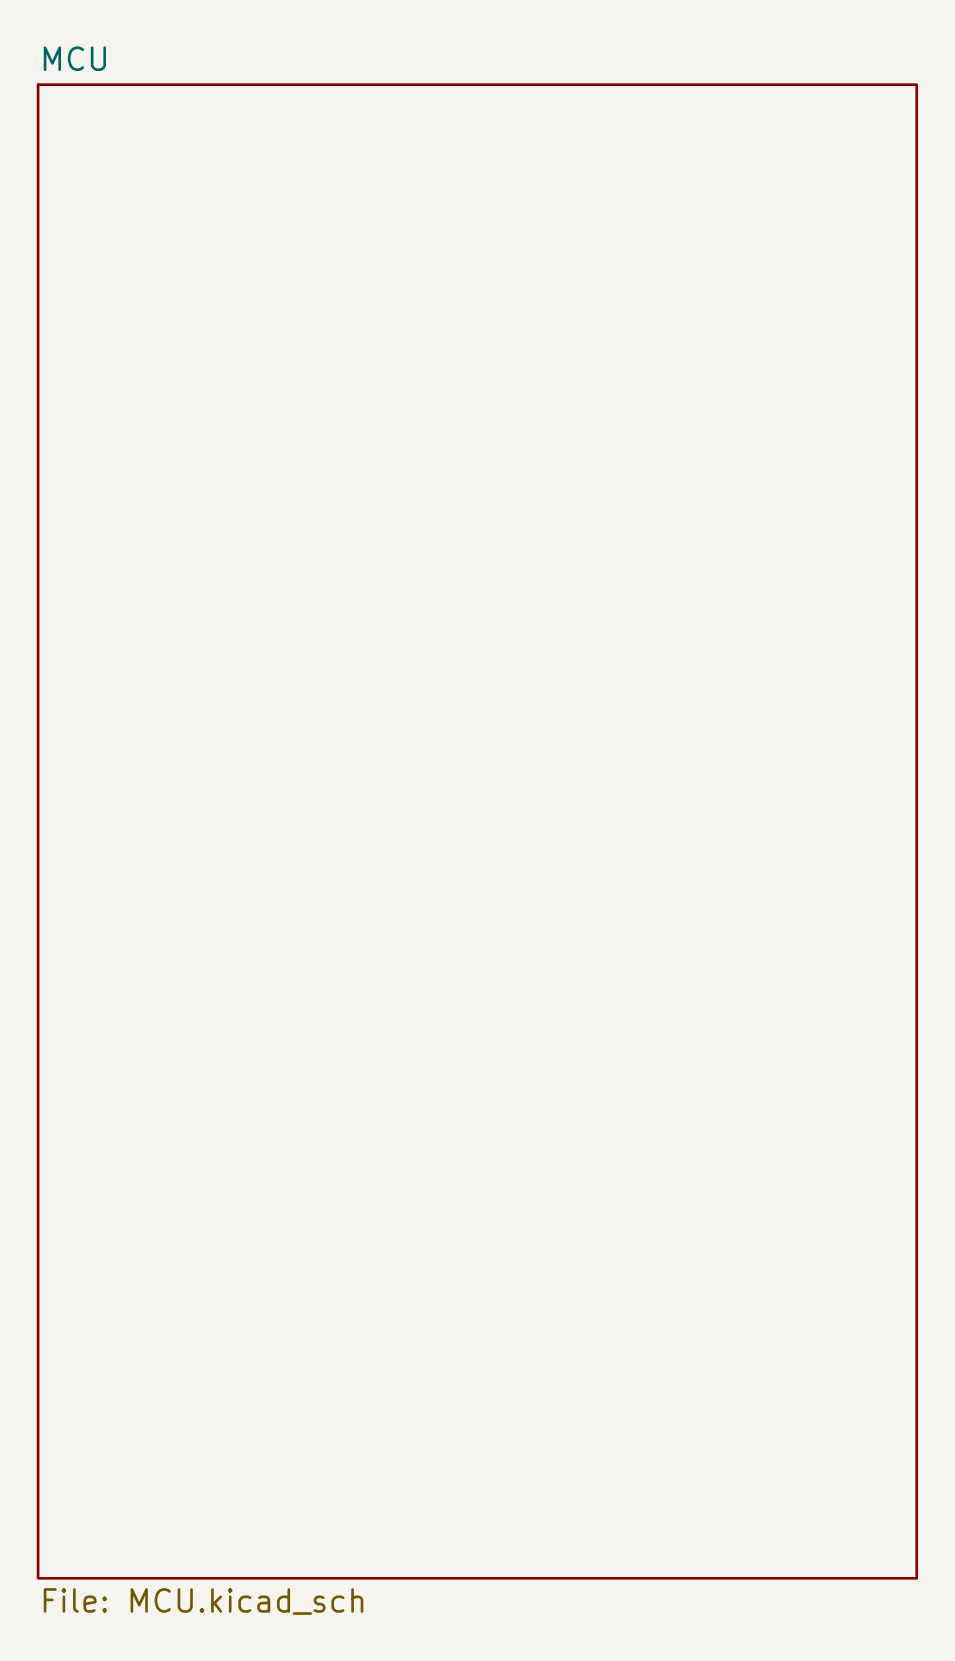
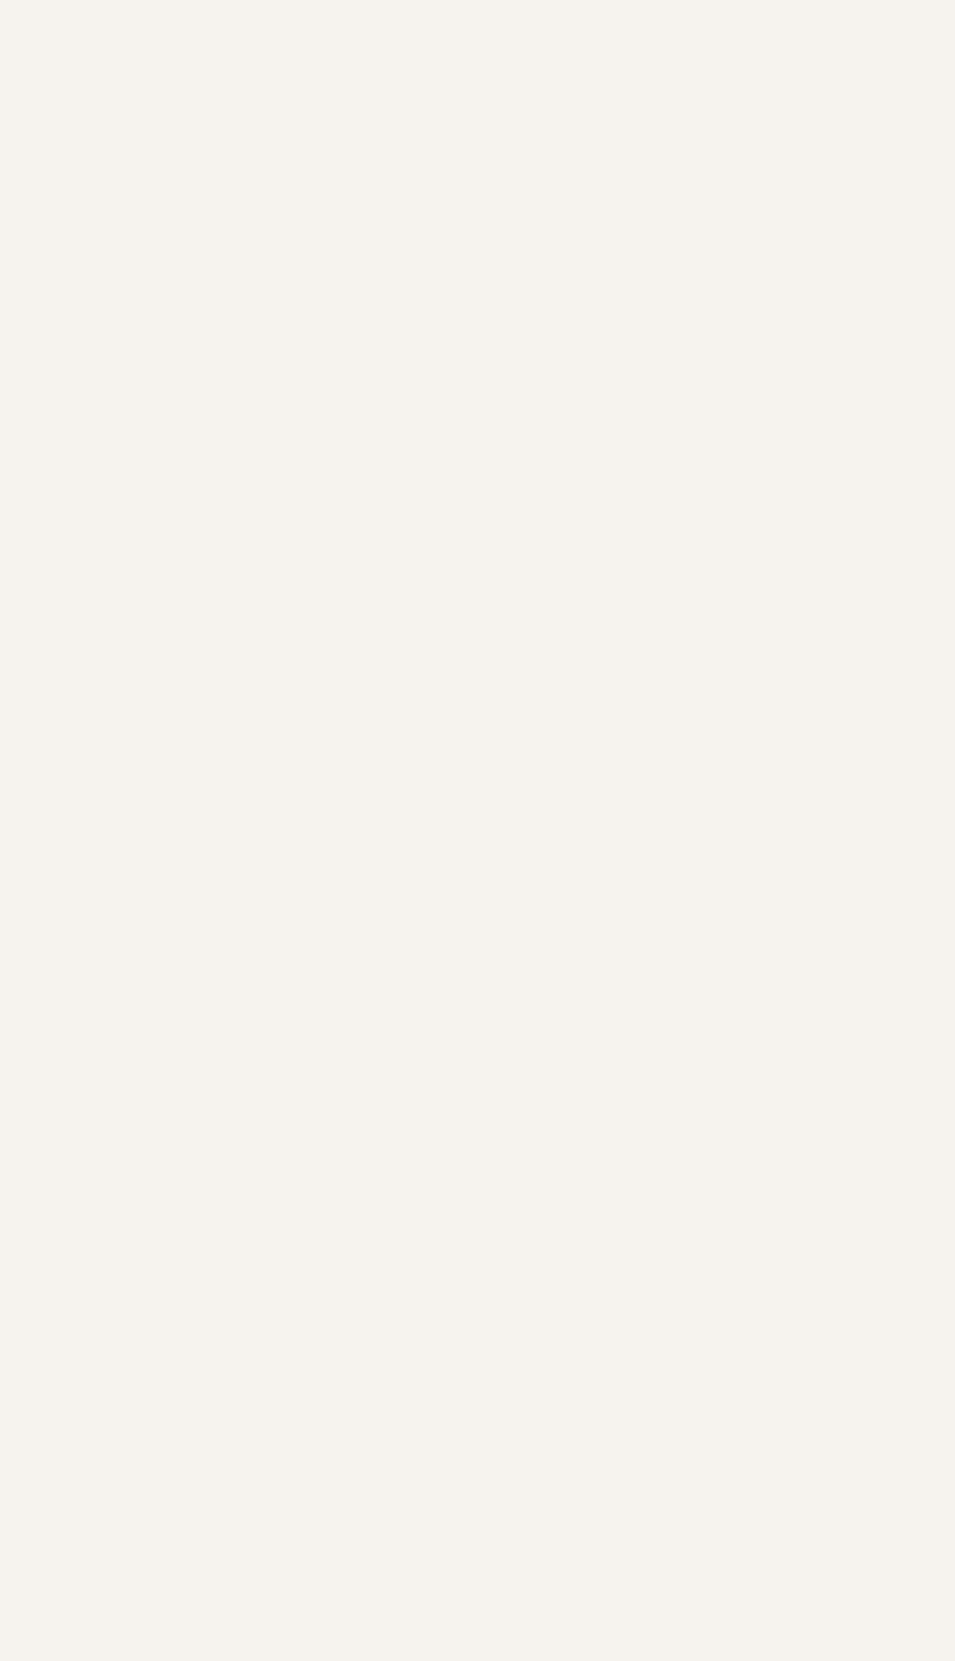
sheet MCU: File: MCU.kicad_sch (477, 831) -> none

